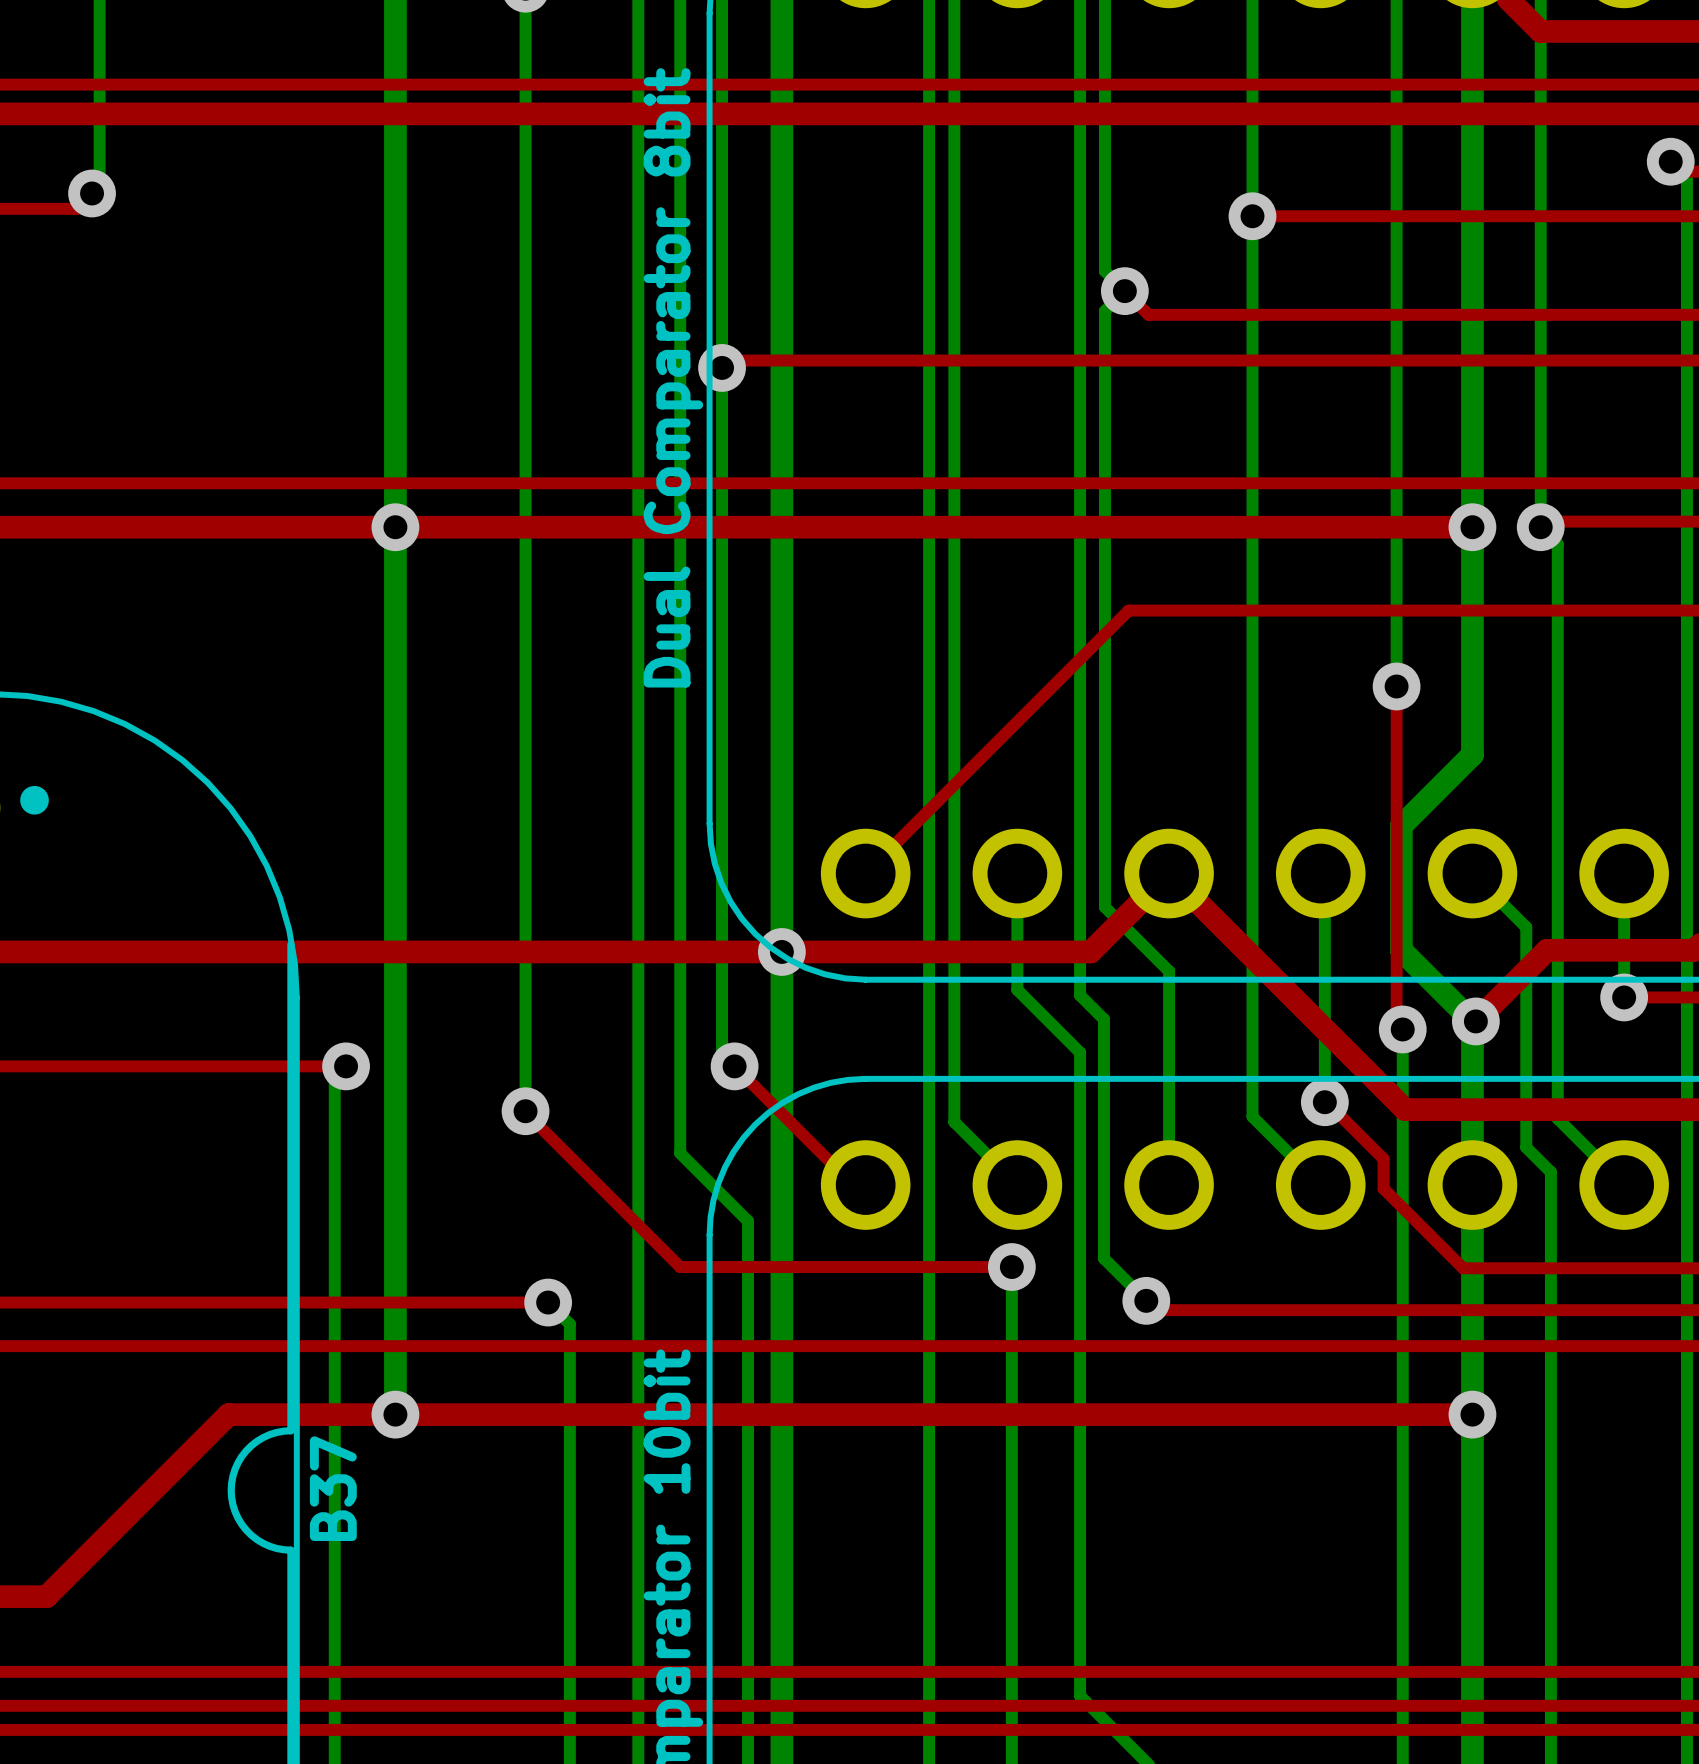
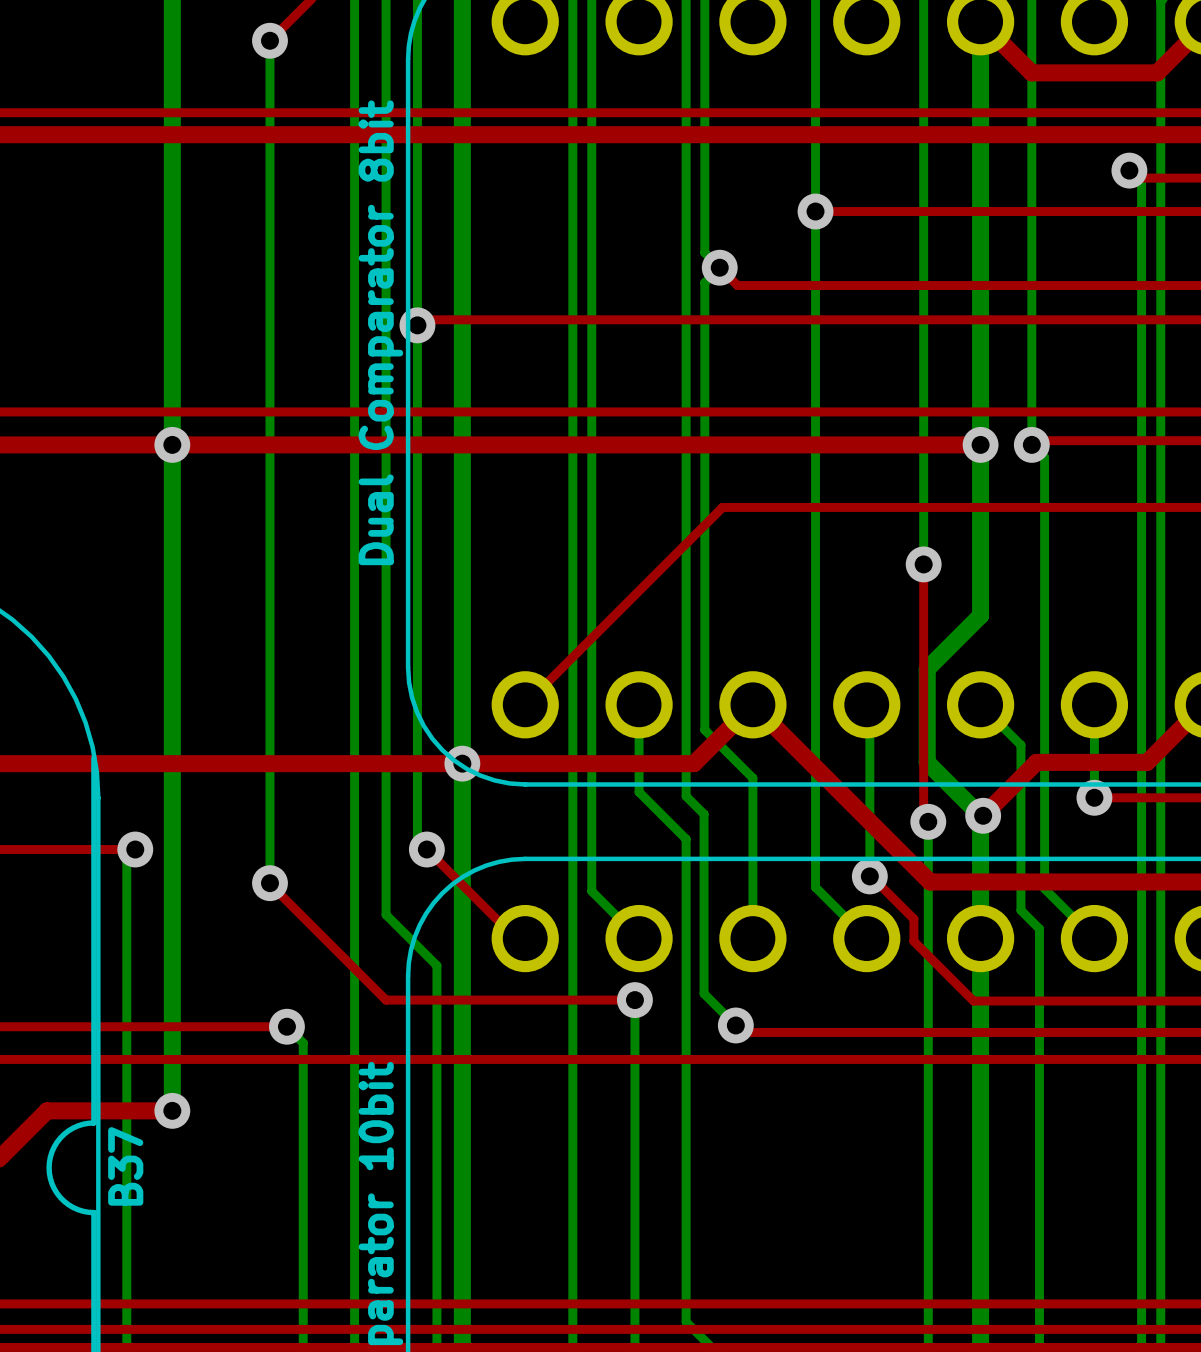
top track: (395, 1414) (1472, 1414) -> none
via: (1472, 1414) -> none

